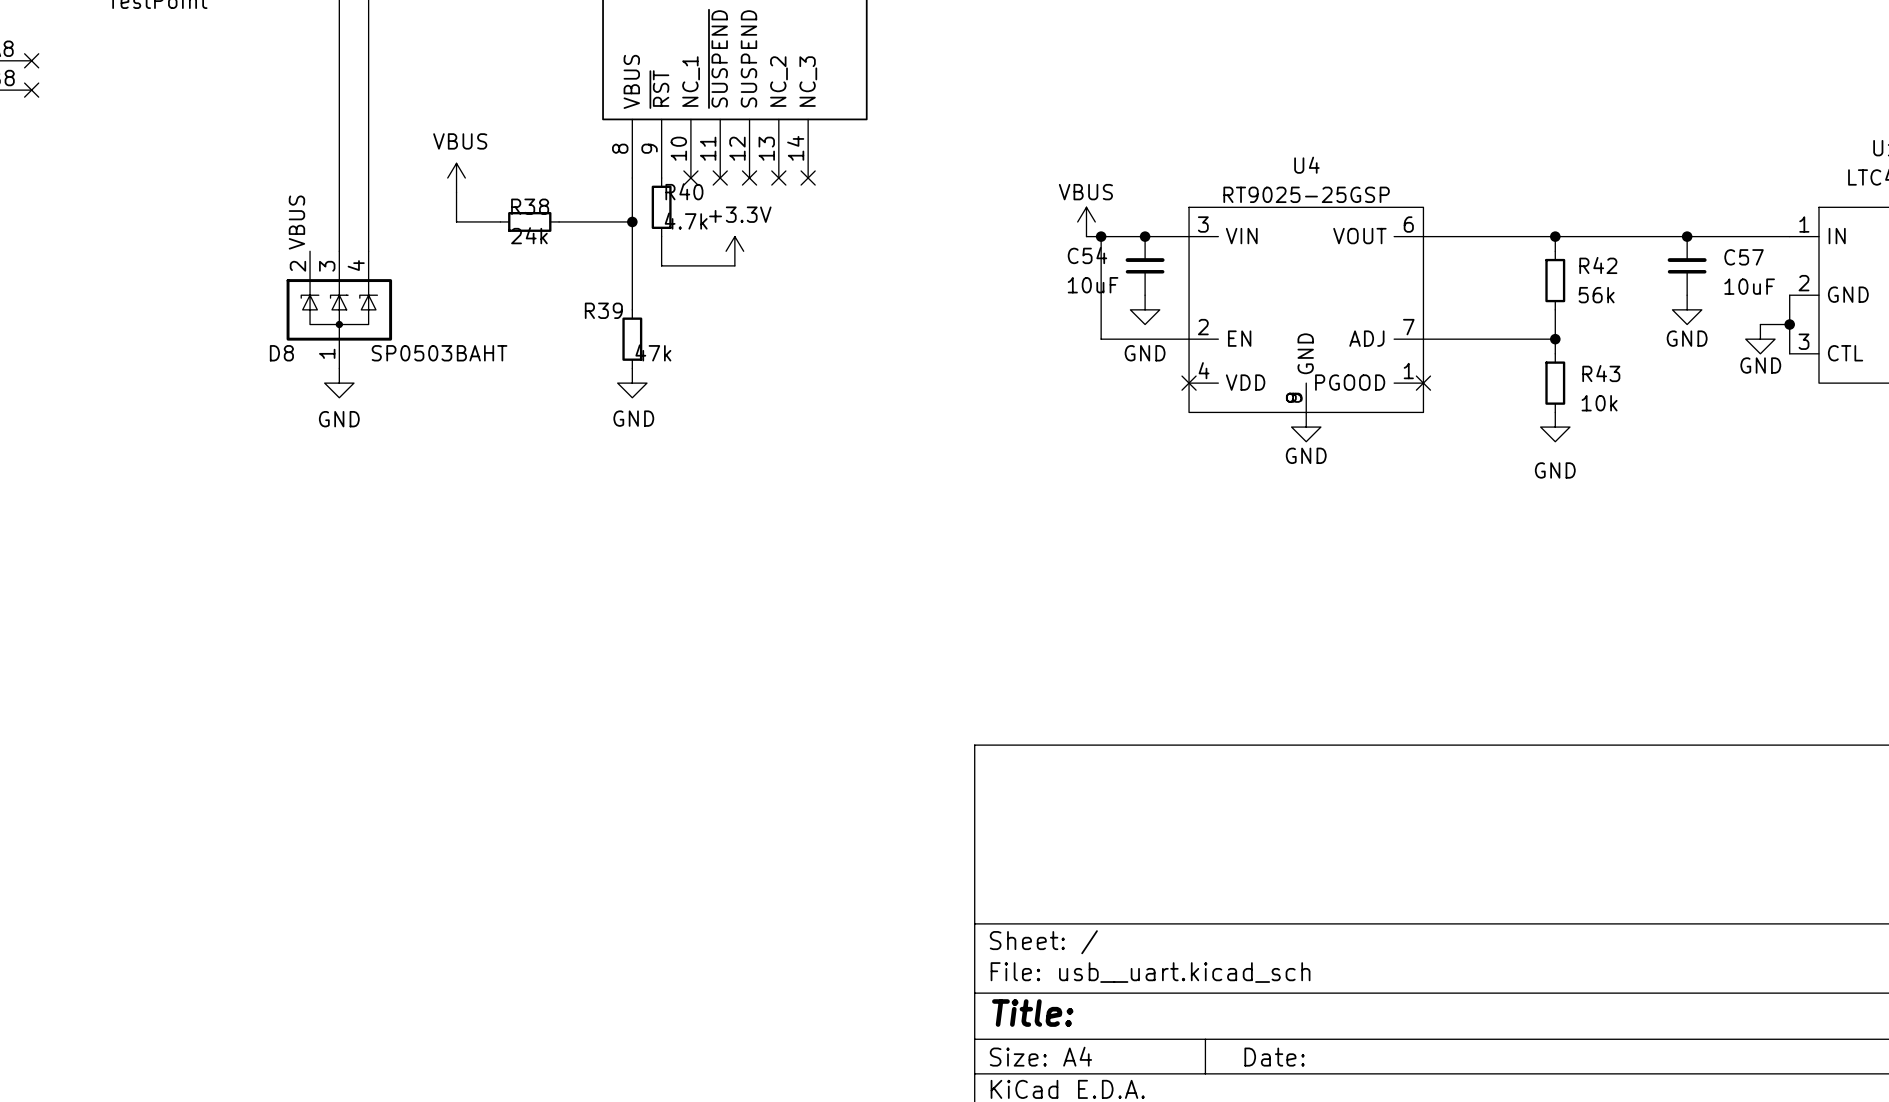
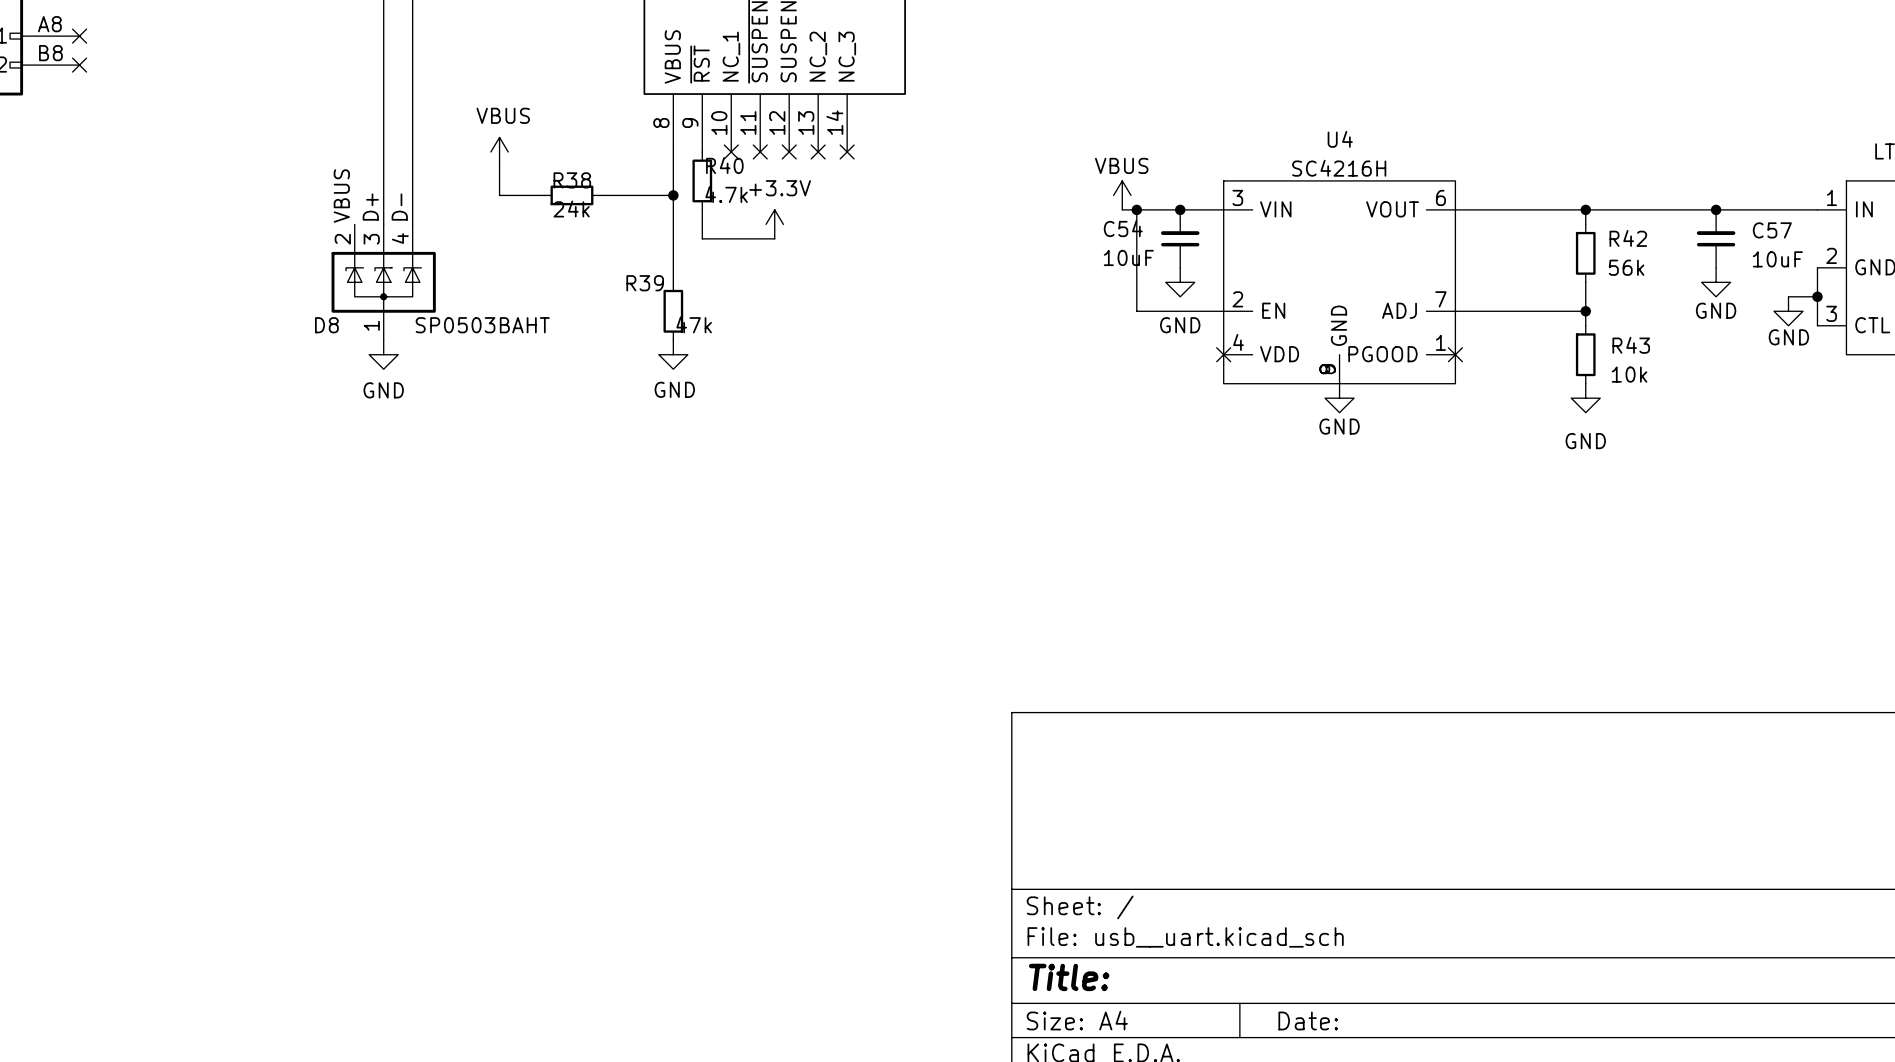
U4 value: RT9025-25GSP (1306, 194) -> SC4216H (1339, 168)
label: none -> D+ (370, 207)
label: none -> D- (399, 207)

